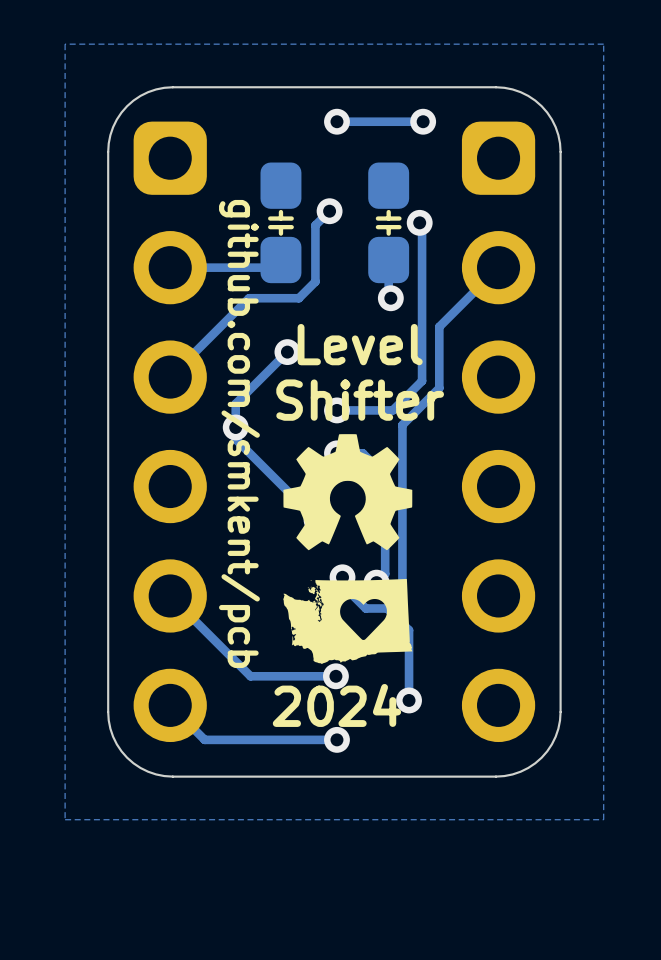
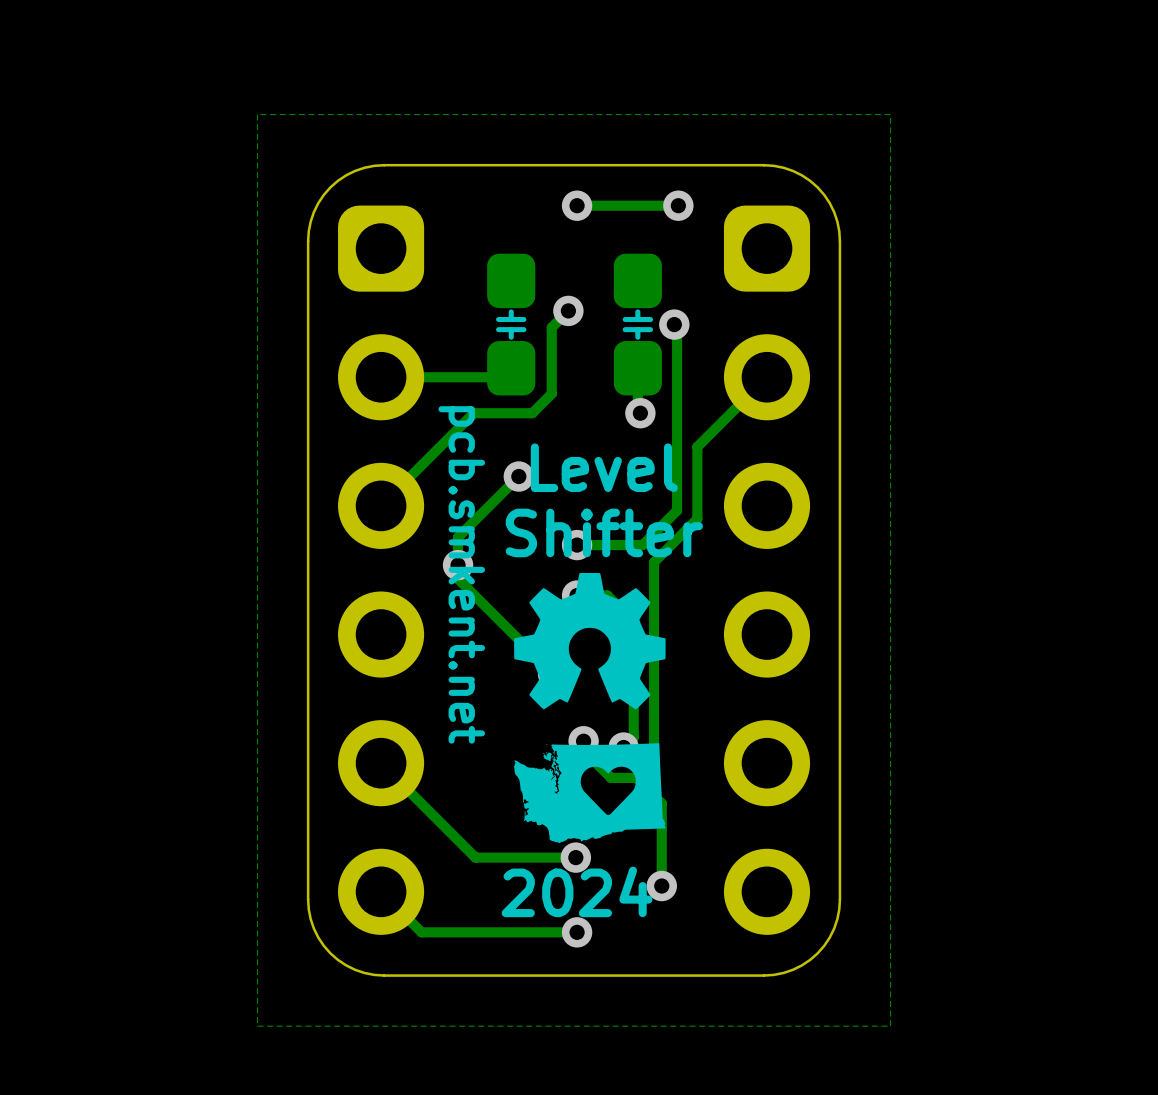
text: github.com/smkent/pcb (239, 433) -> pcb.smkent.net (461, 574)

